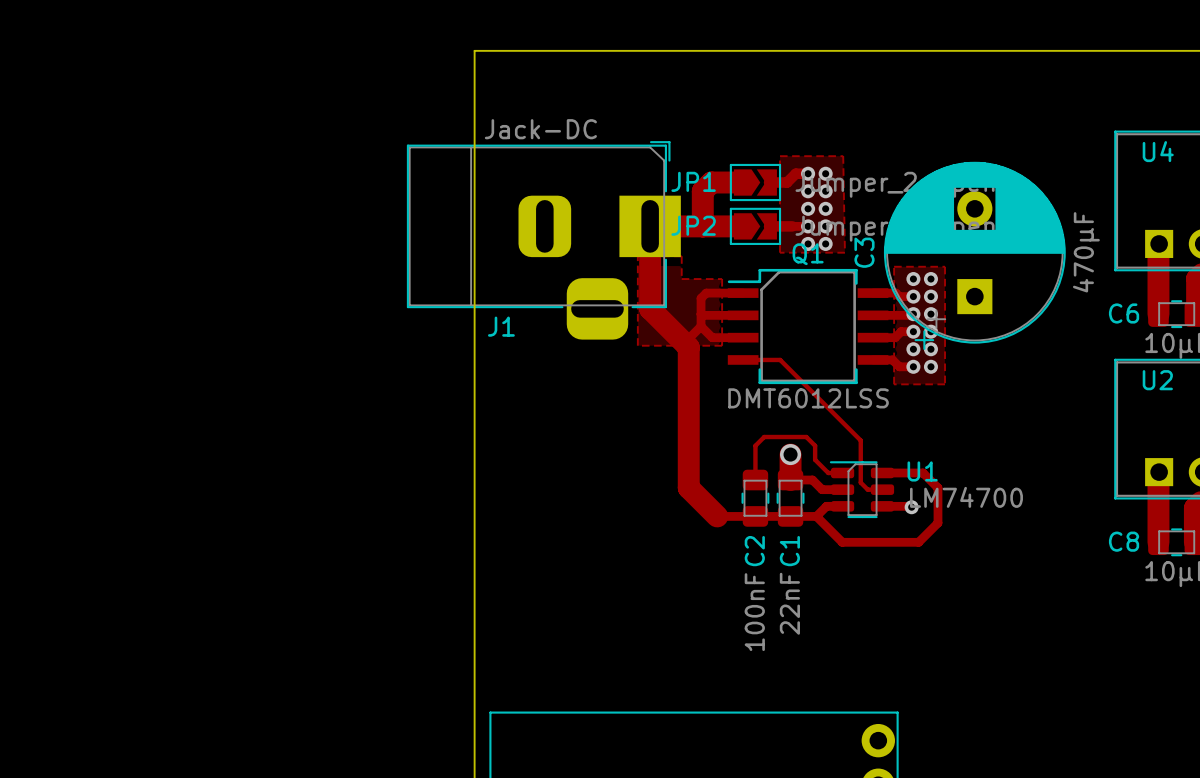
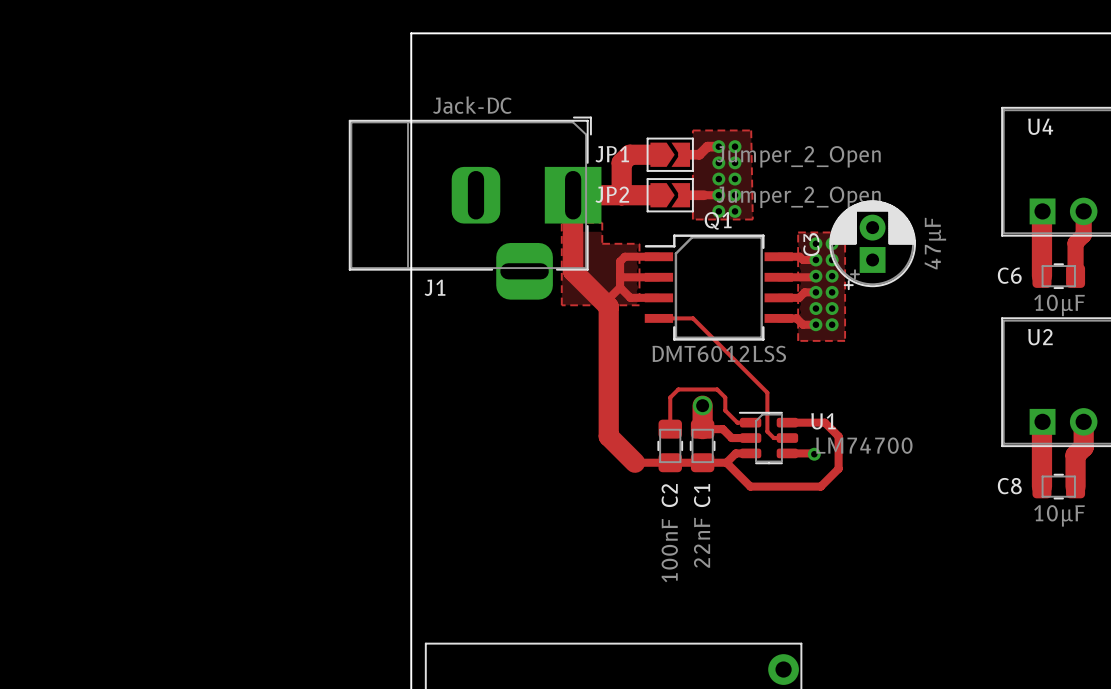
C3 footprint: [883, 161, 1066, 350] -> [829, 200, 916, 291]
C3 name position: C3 (864, 252) -> C3 (811, 244)
C3 value: 470µF (1086, 252) -> 47µF (935, 243)

